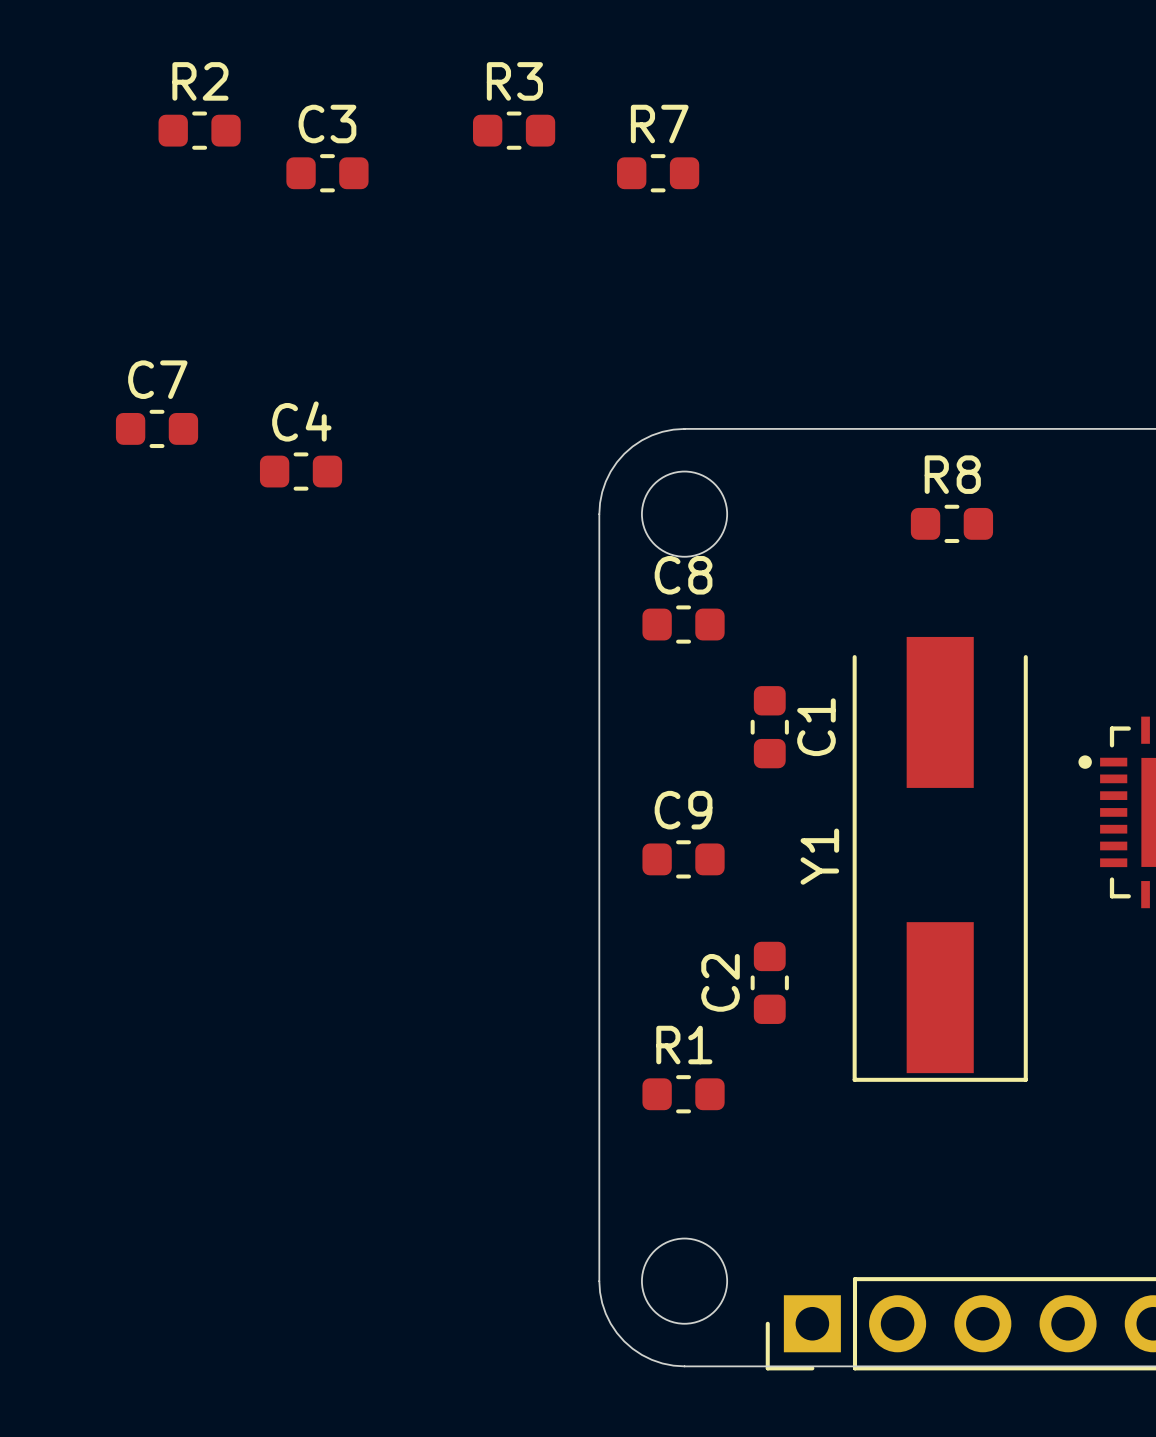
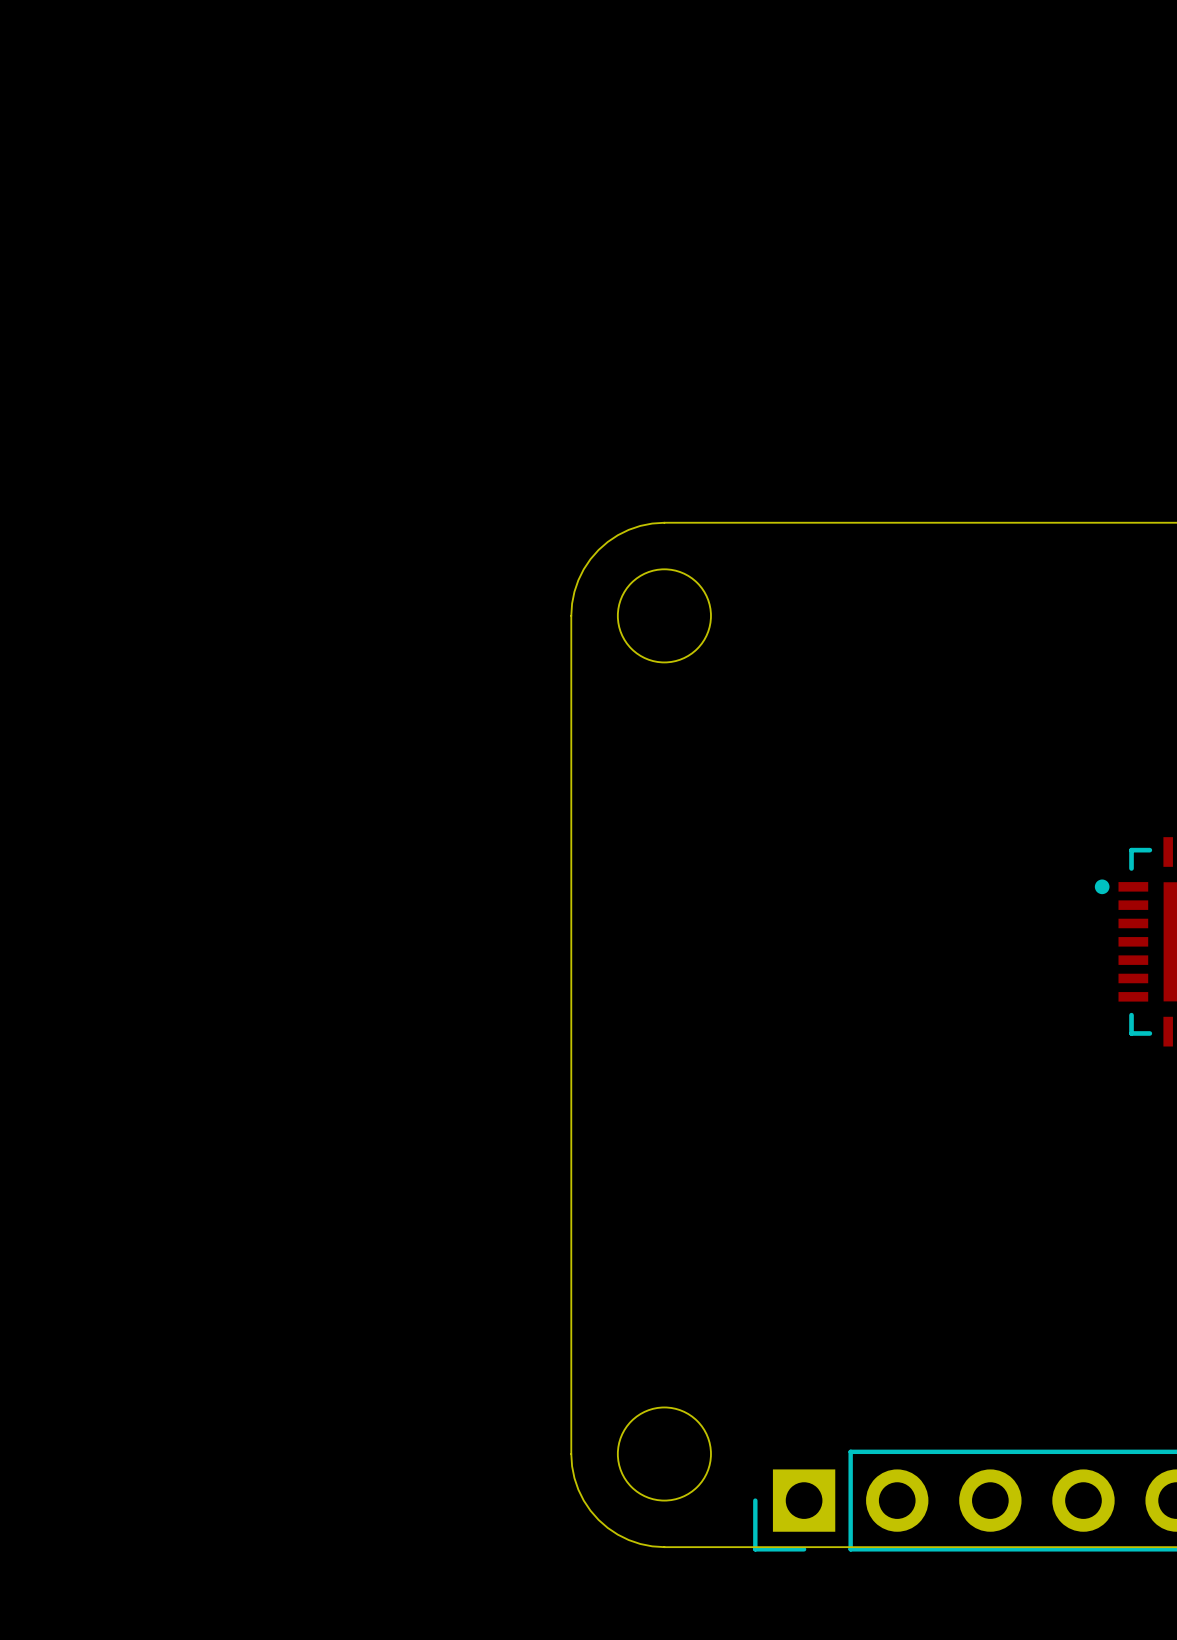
R2: (199, 130) -> none
R3: (514, 130) -> none
C3: (327, 173) -> none
R7: (658, 173) -> none
C7: (157, 428) -> none
C4: (301, 471) -> none
R8: (951, 523) -> none
C8: (683, 624) -> none
C1: (769, 727) -> none
C9: (683, 859) -> none
Y1: (940, 859) -> none
C2: (769, 982) -> none
R1: (683, 1094) -> none

